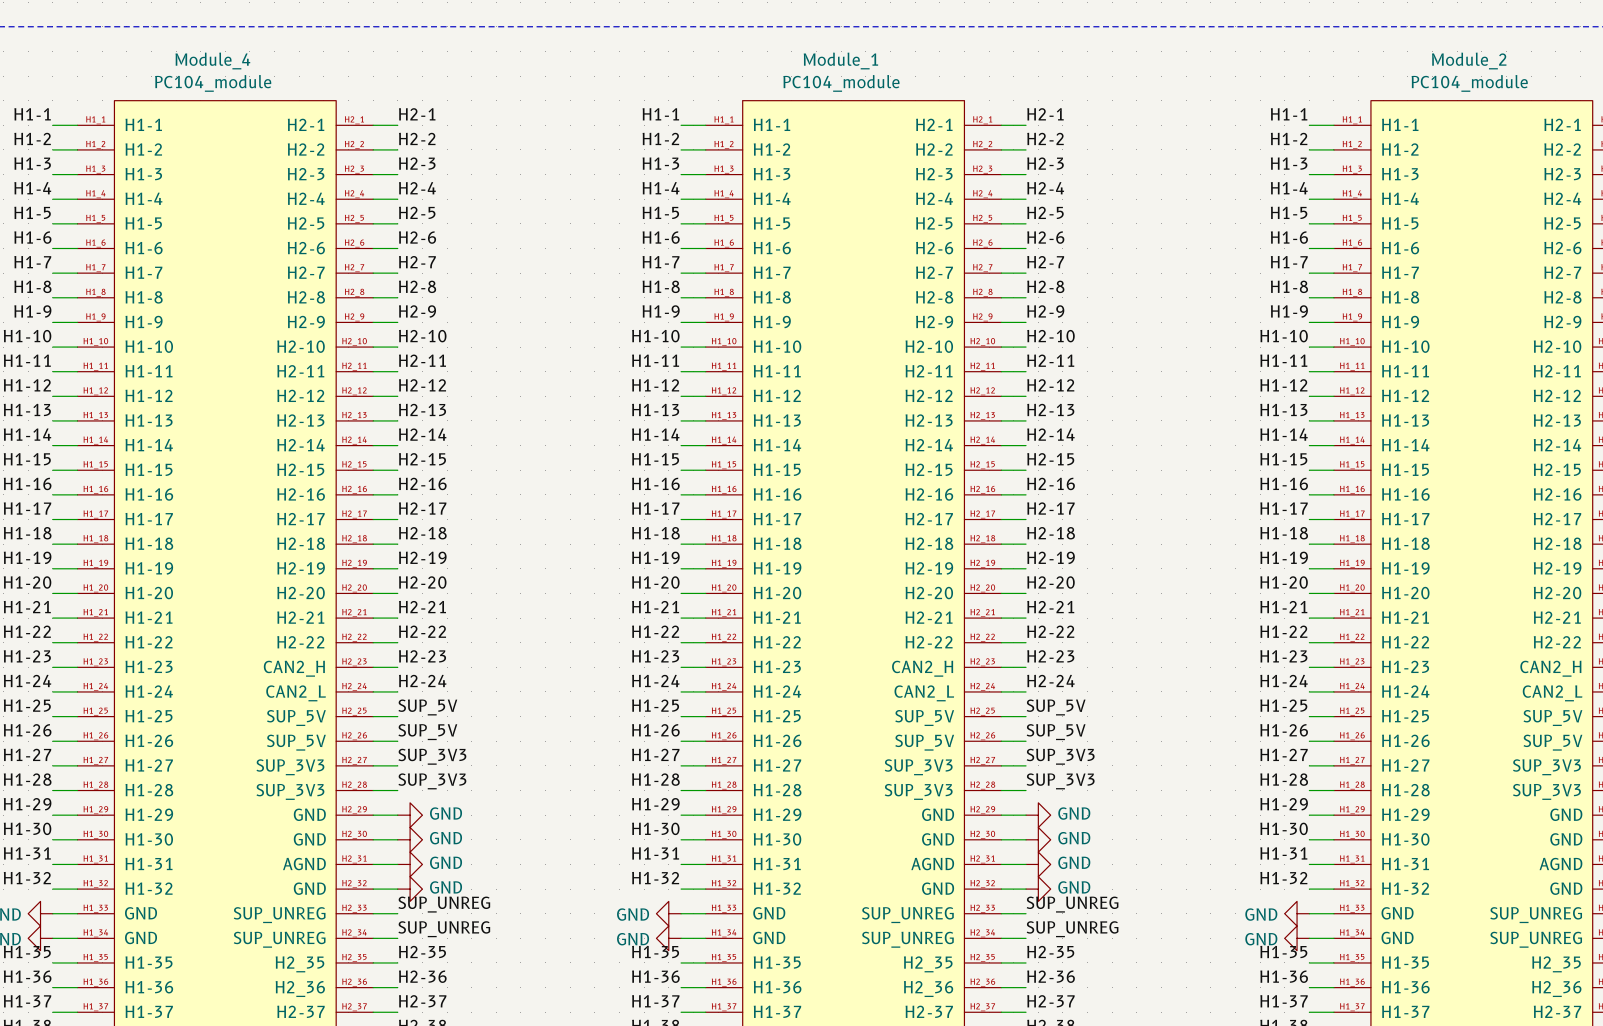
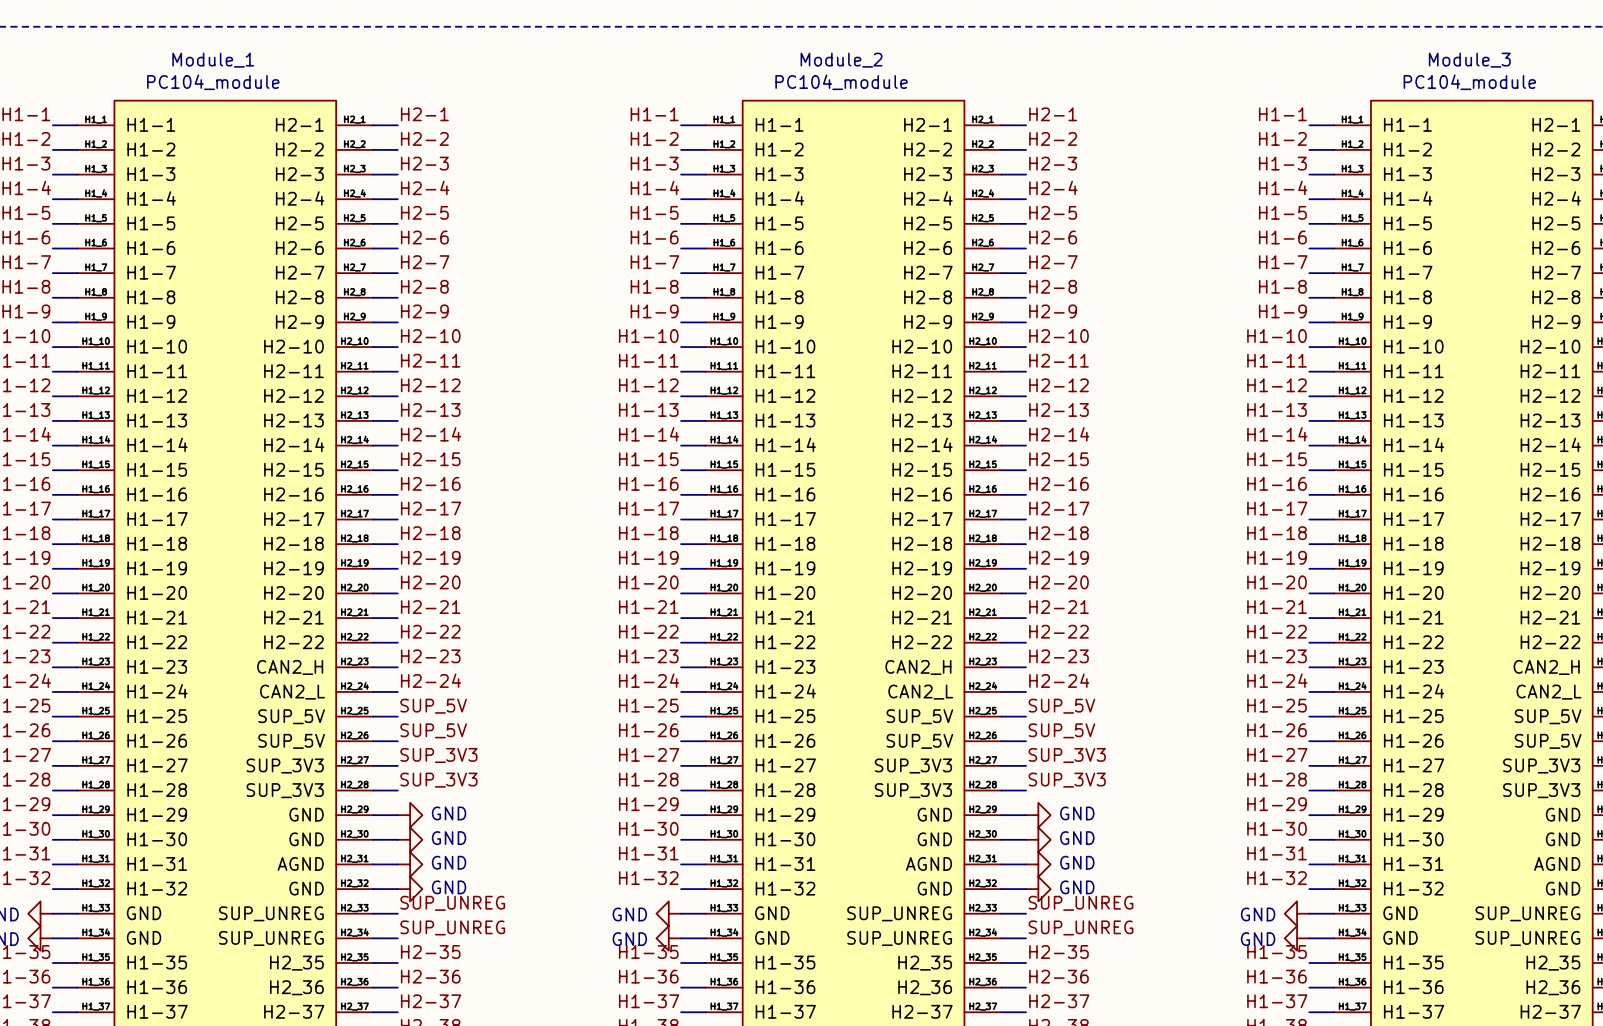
Module_4 name: Module_4 (212, 61) -> Module_1 (213, 60)
Module_1 name: Module_1 (840, 61) -> Module_2 (841, 60)
Module_2 name: Module_2 (1469, 61) -> Module_3 (1469, 60)

